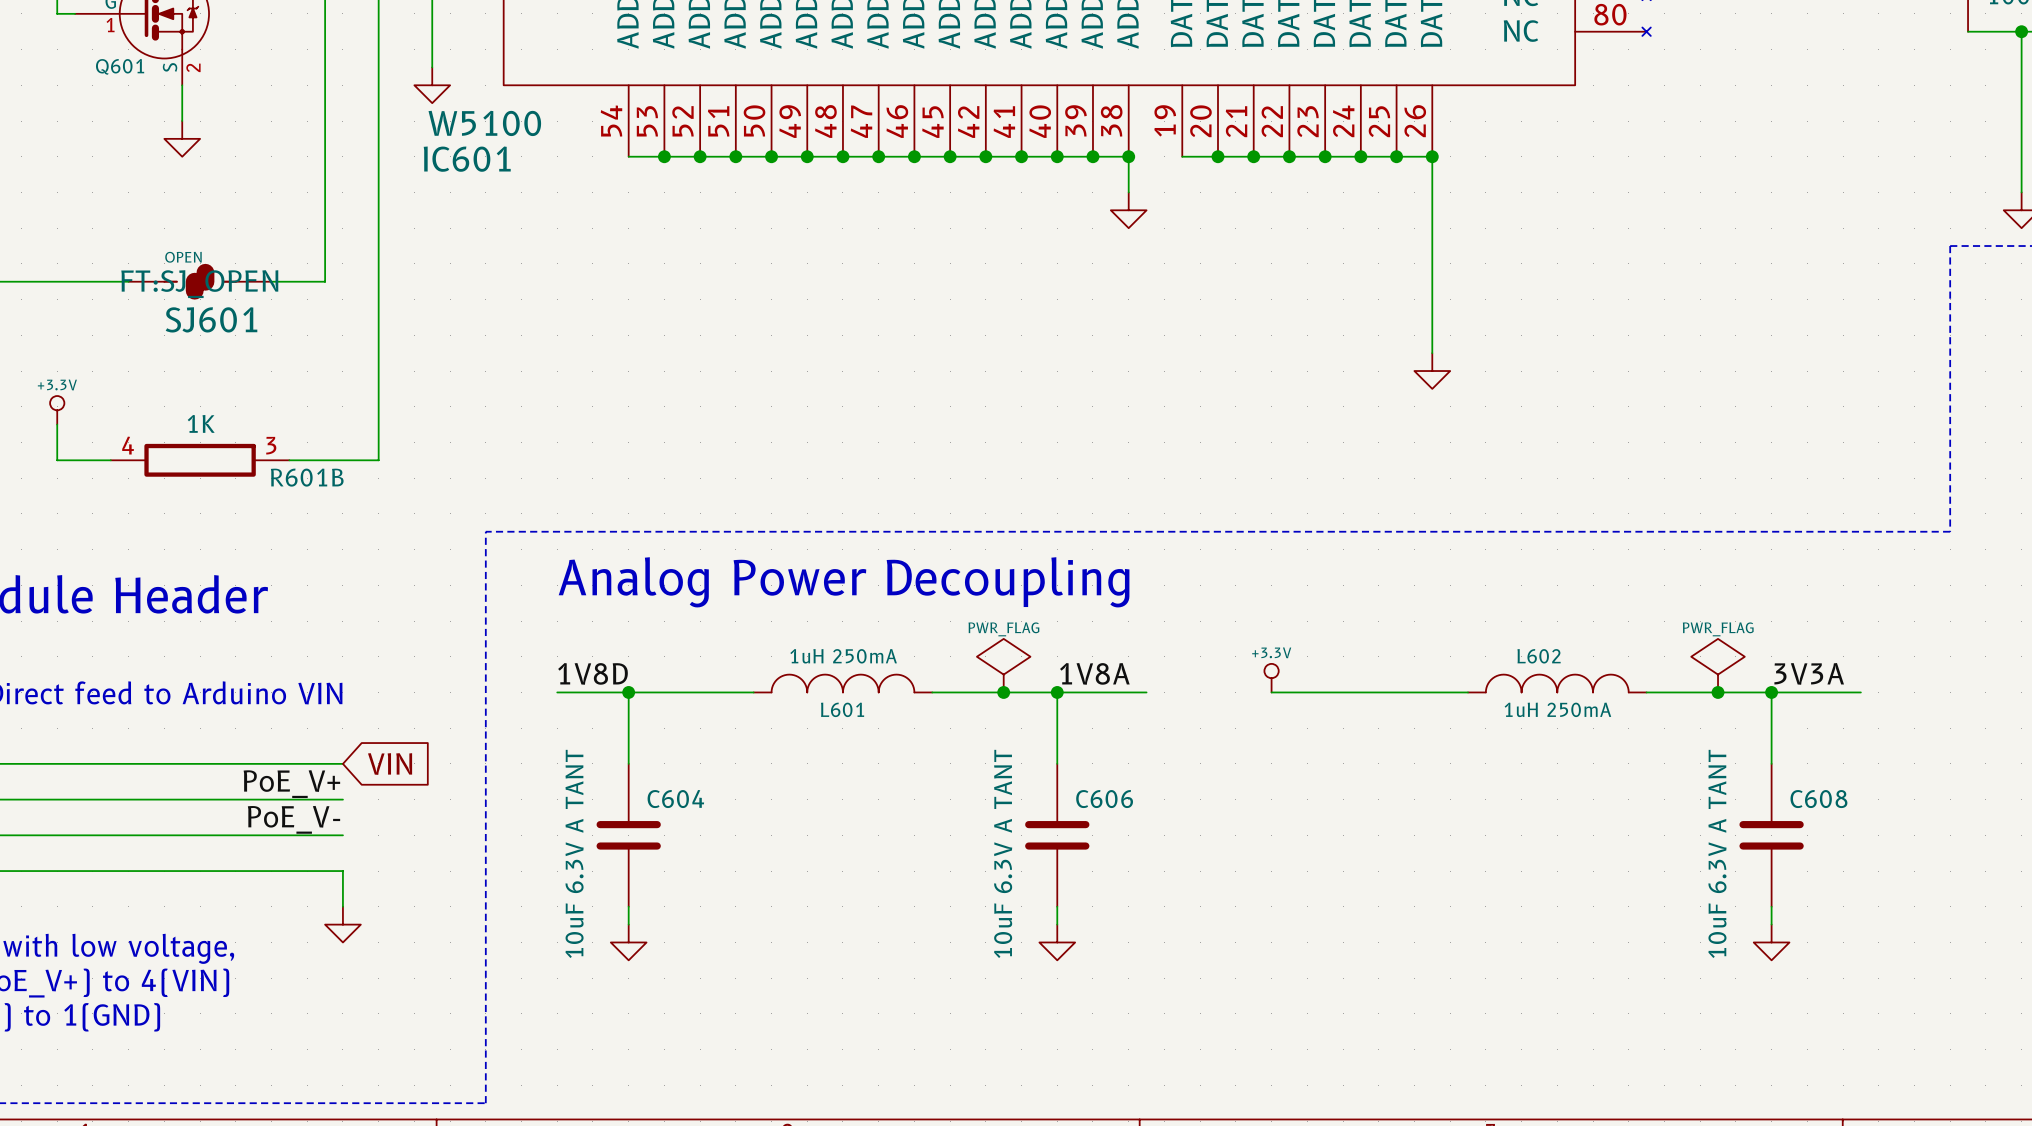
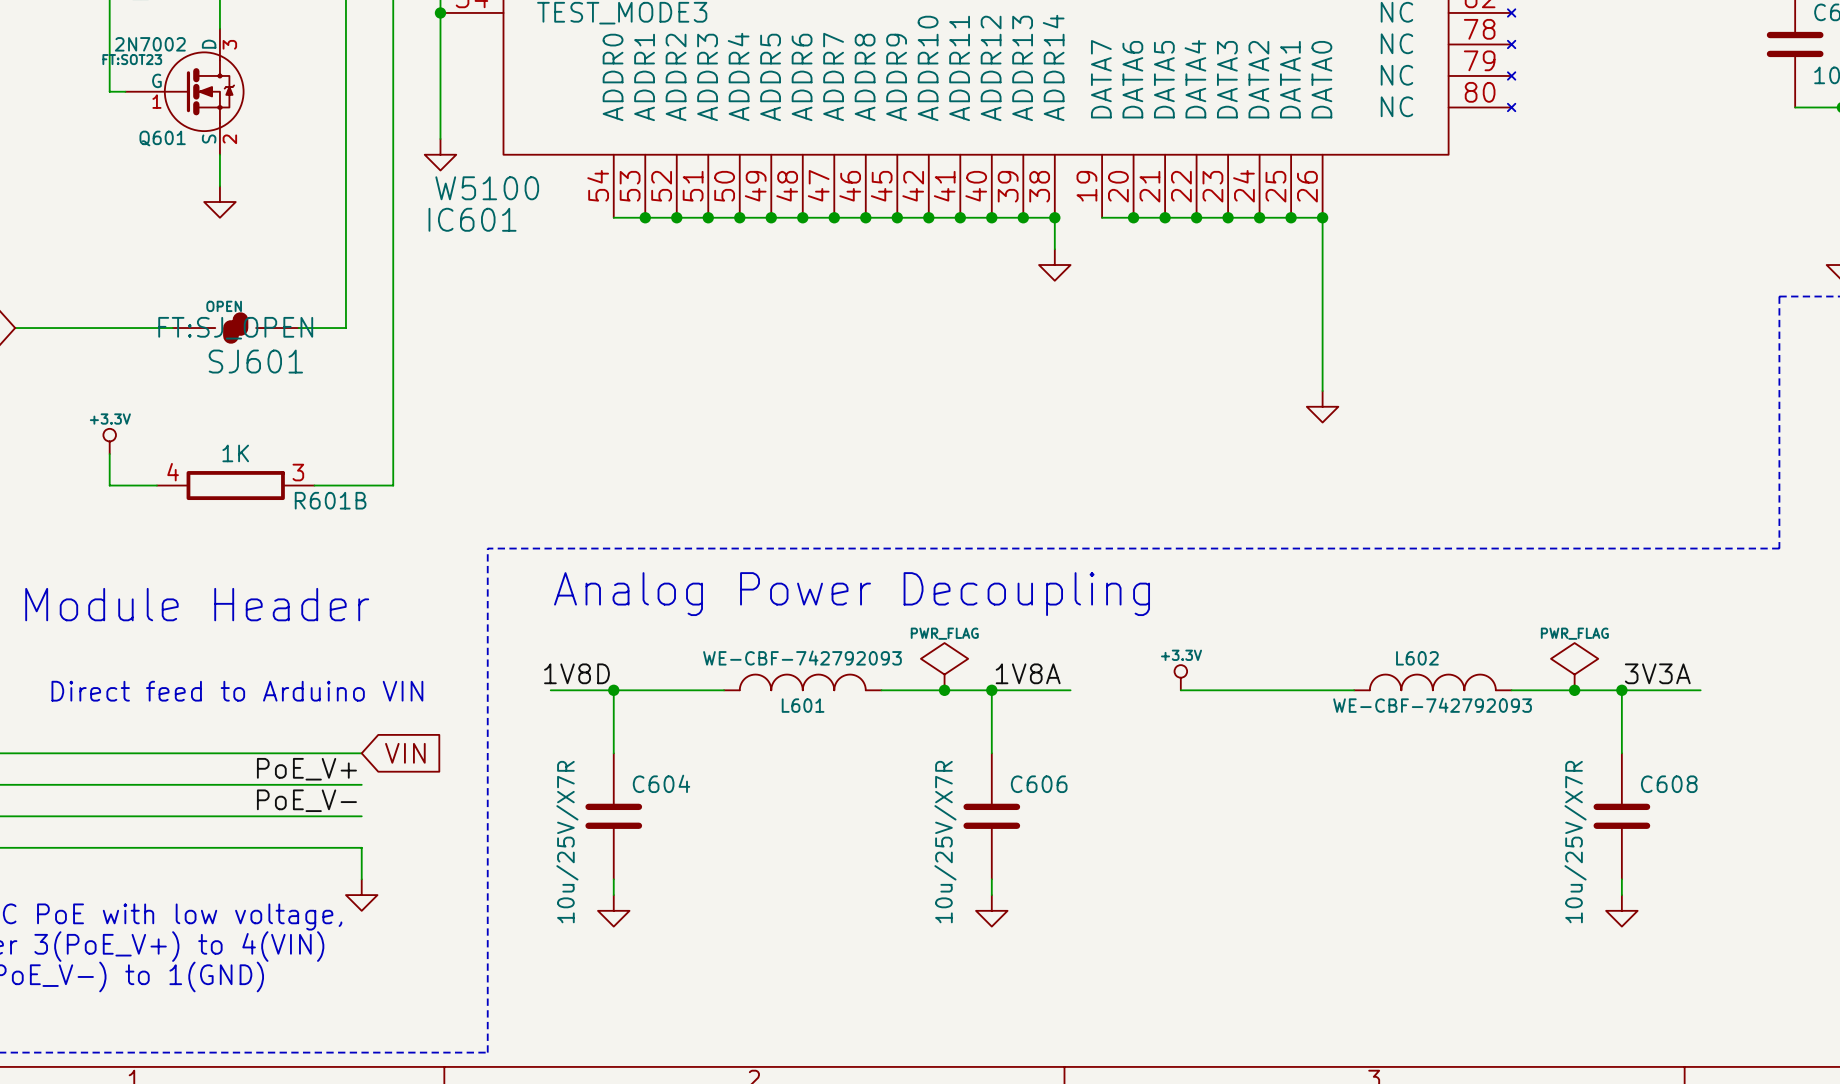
L601 value: 1uH 250mA (843, 656) -> WE-CBF-742792093 (802, 658)
L602 value: 1uH 250mA (1557, 709) -> WE-CBF-742792093 (1432, 705)
C604 value: 10uF 6.3V A TANT (574, 853) -> 10u/25V/X7R (567, 842)
C606 value: 10uF 6.3V A TANT (1003, 853) -> 10u/25V/X7R (945, 842)
C608 value: 10uF 6.3V A TANT (1717, 853) -> 10u/25V/X7R (1575, 842)

